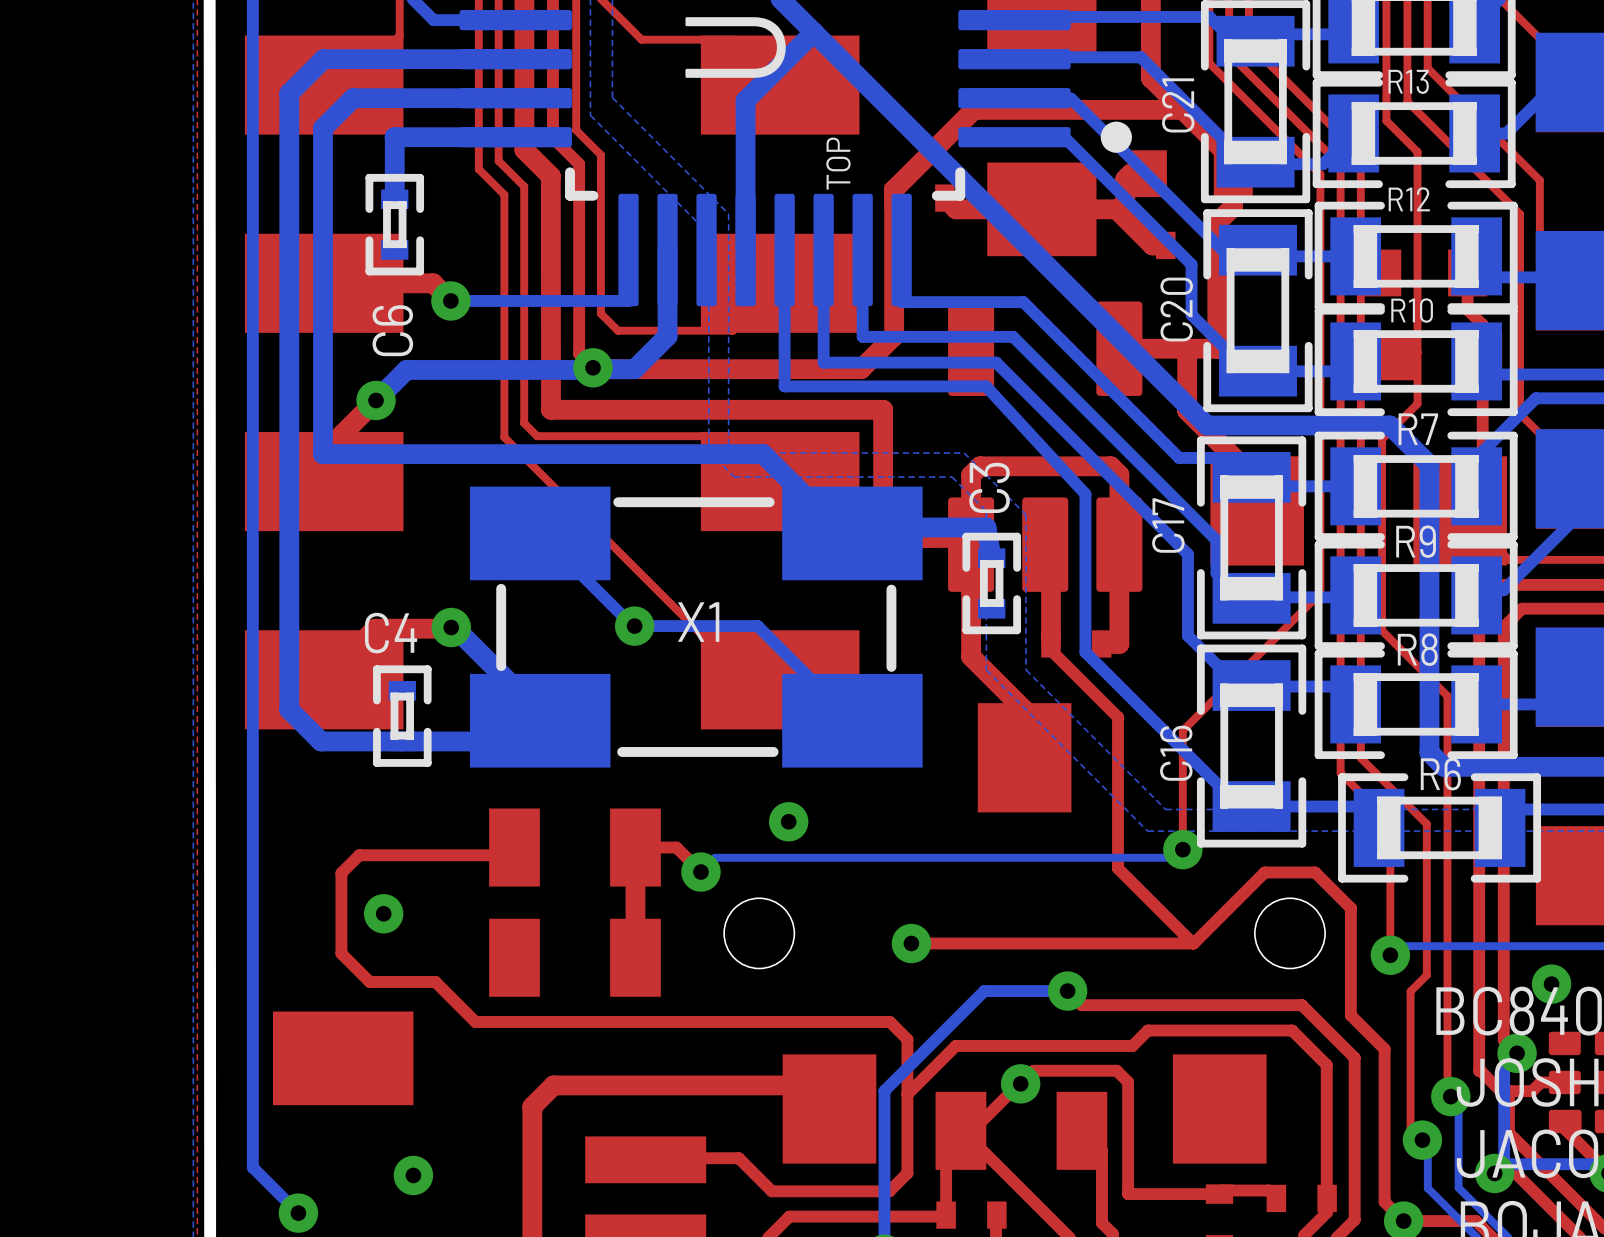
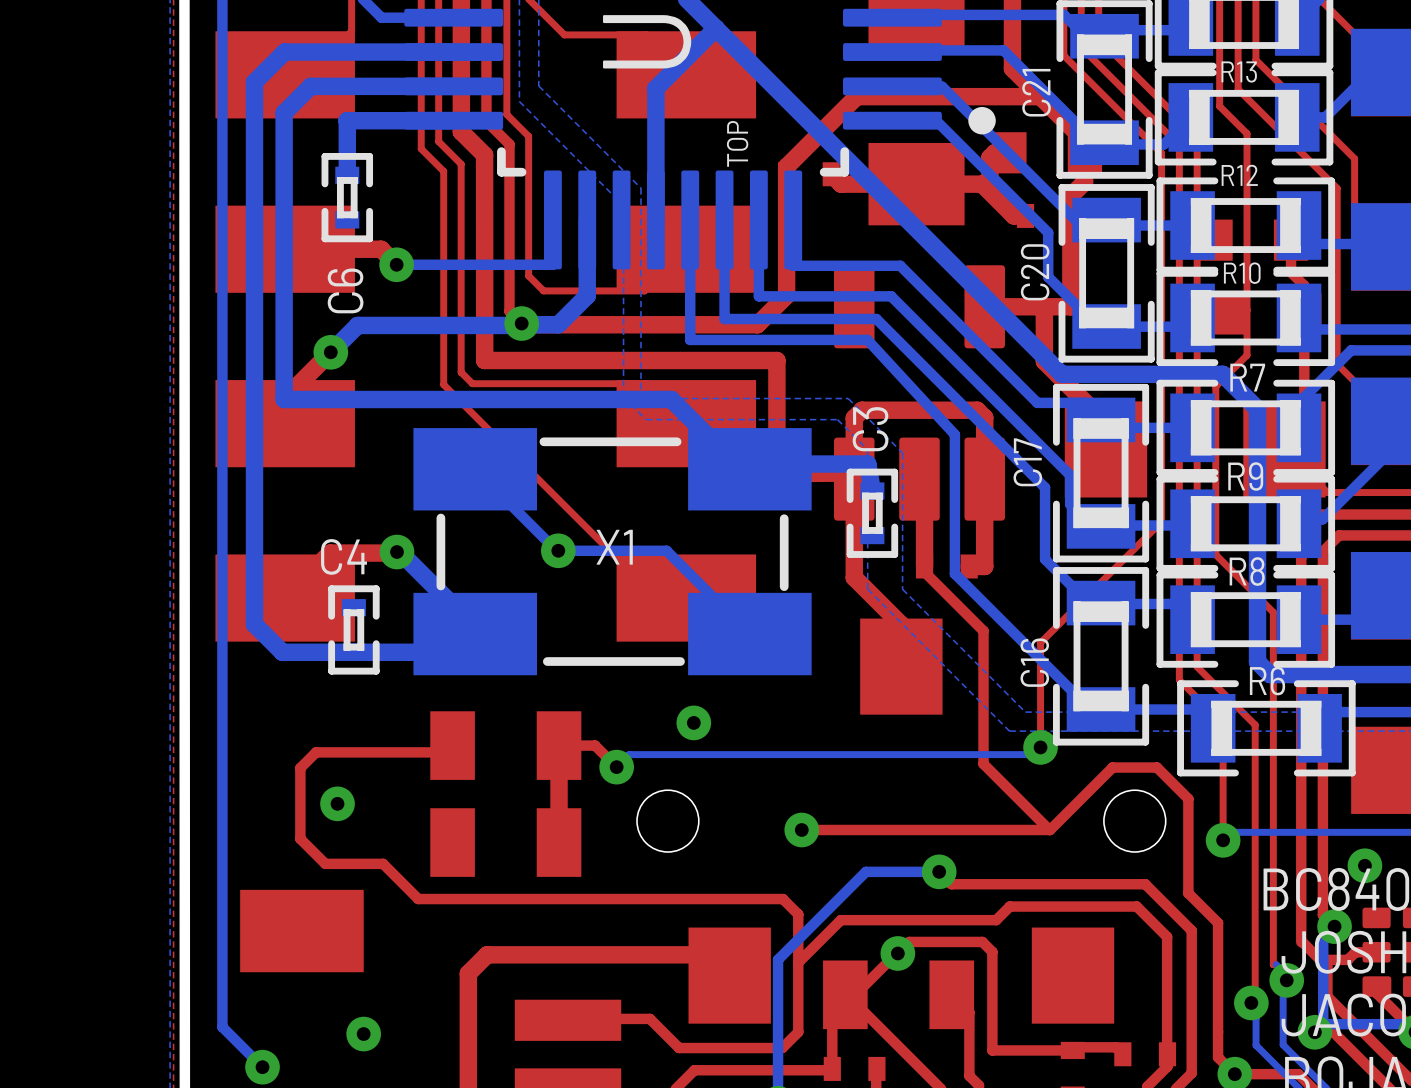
top track: (1426, 975) (1410, 991) (1410, 1128) (1422, 1140) -> (1255, 857) (1255, 1009) (1251, 1013)
via position: (1450, 1096) -> (1286, 980)

